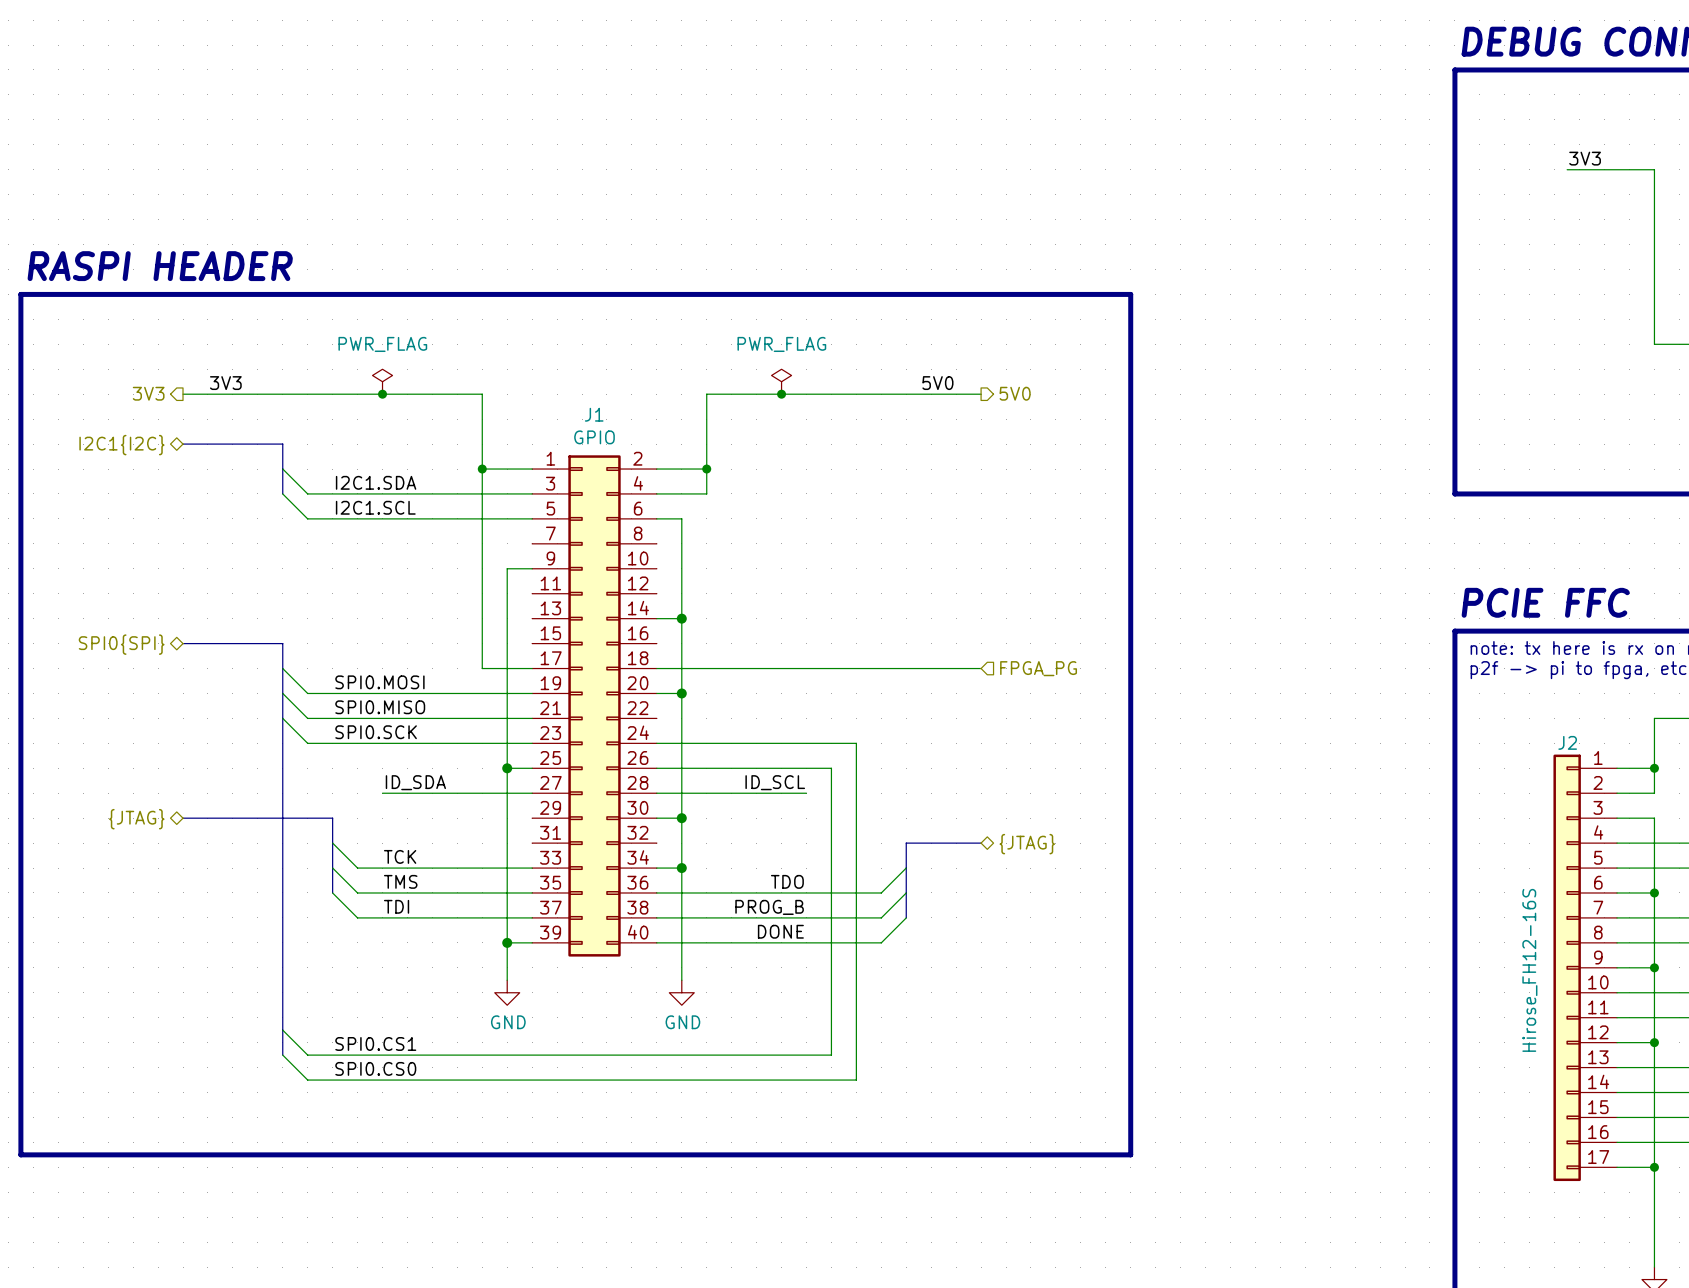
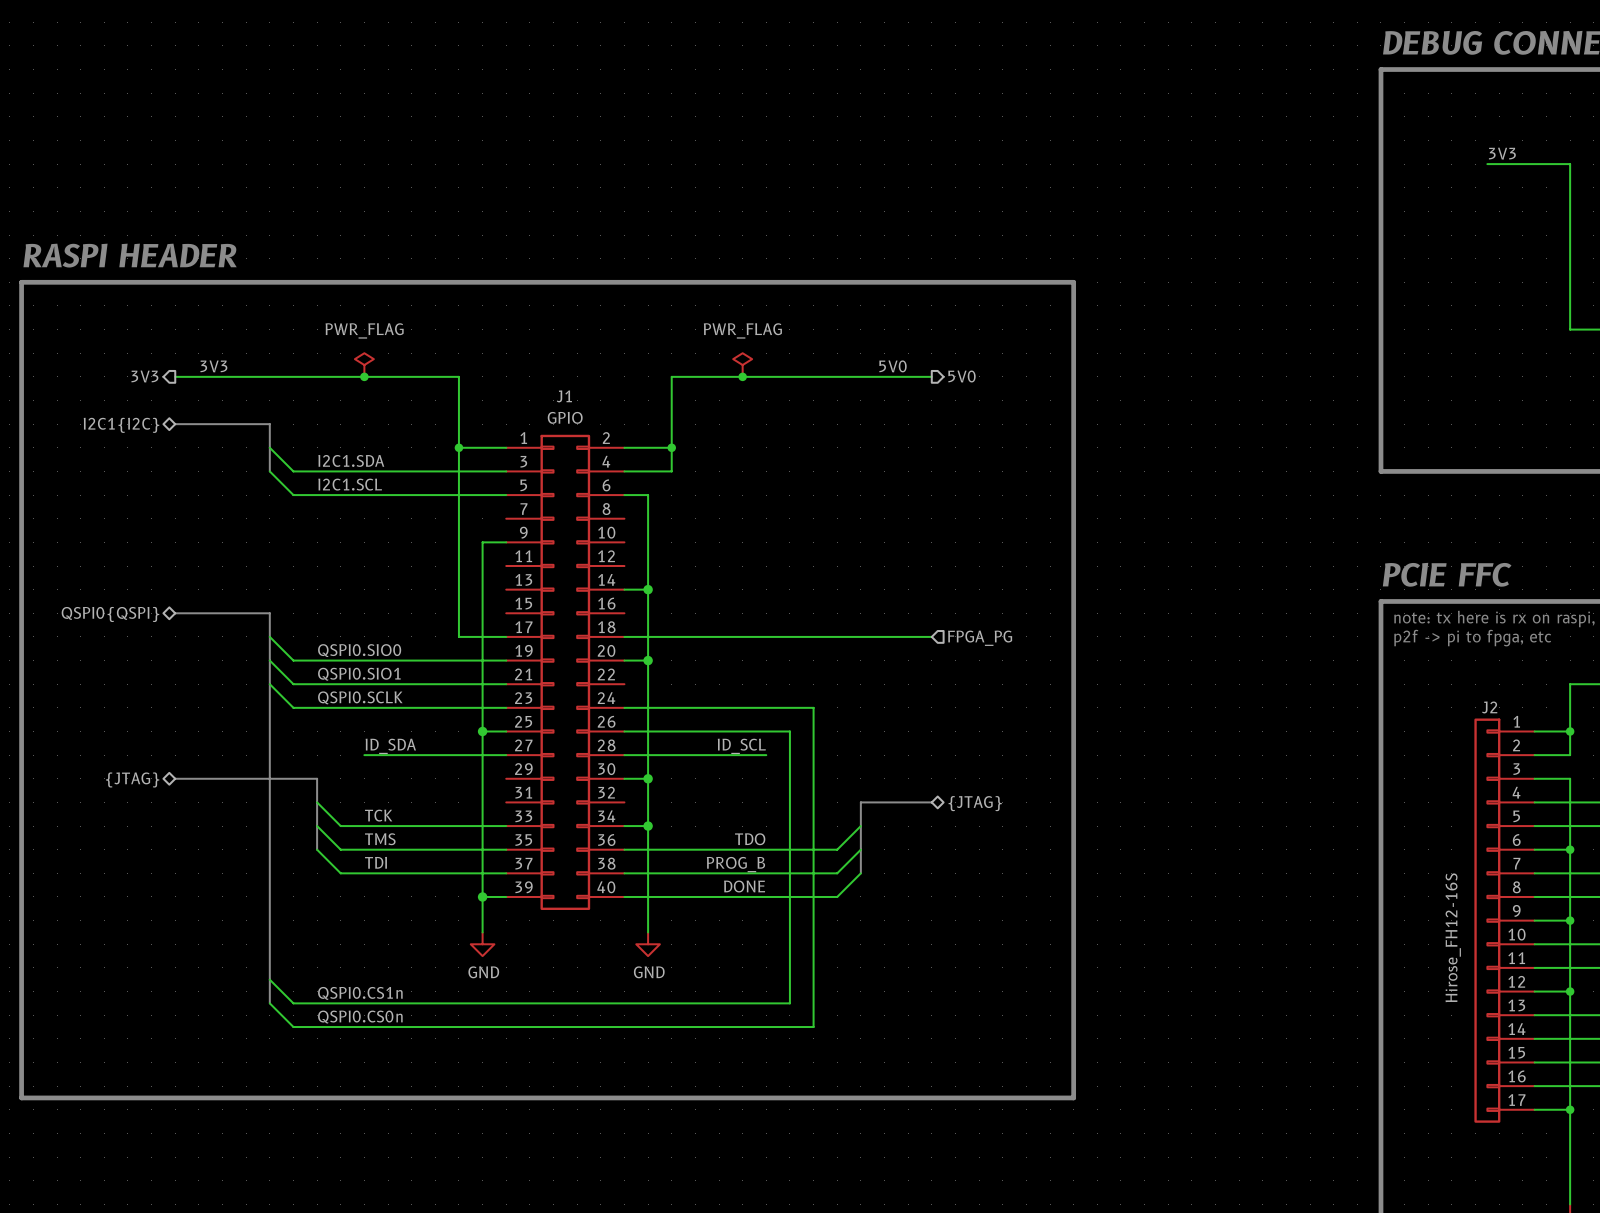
hierarchical label: SPI0{SPI} (121, 644) -> QSPI0{QSPI} (110, 614)
label: SPI0.MOSI (379, 682) -> QSPI0.SIO0 (359, 650)
label: SPI0.MISO (380, 707) -> QSPI0.SIO1 (359, 674)
label: SPI0.SCK (376, 732) -> QSPI0.SCLK (360, 697)
label: SPI0.CS1 (375, 1043) -> QSPI0.CS1n (360, 993)
label: SPI0.CS0 (375, 1068) -> QSPI0.CS0n (360, 1017)

